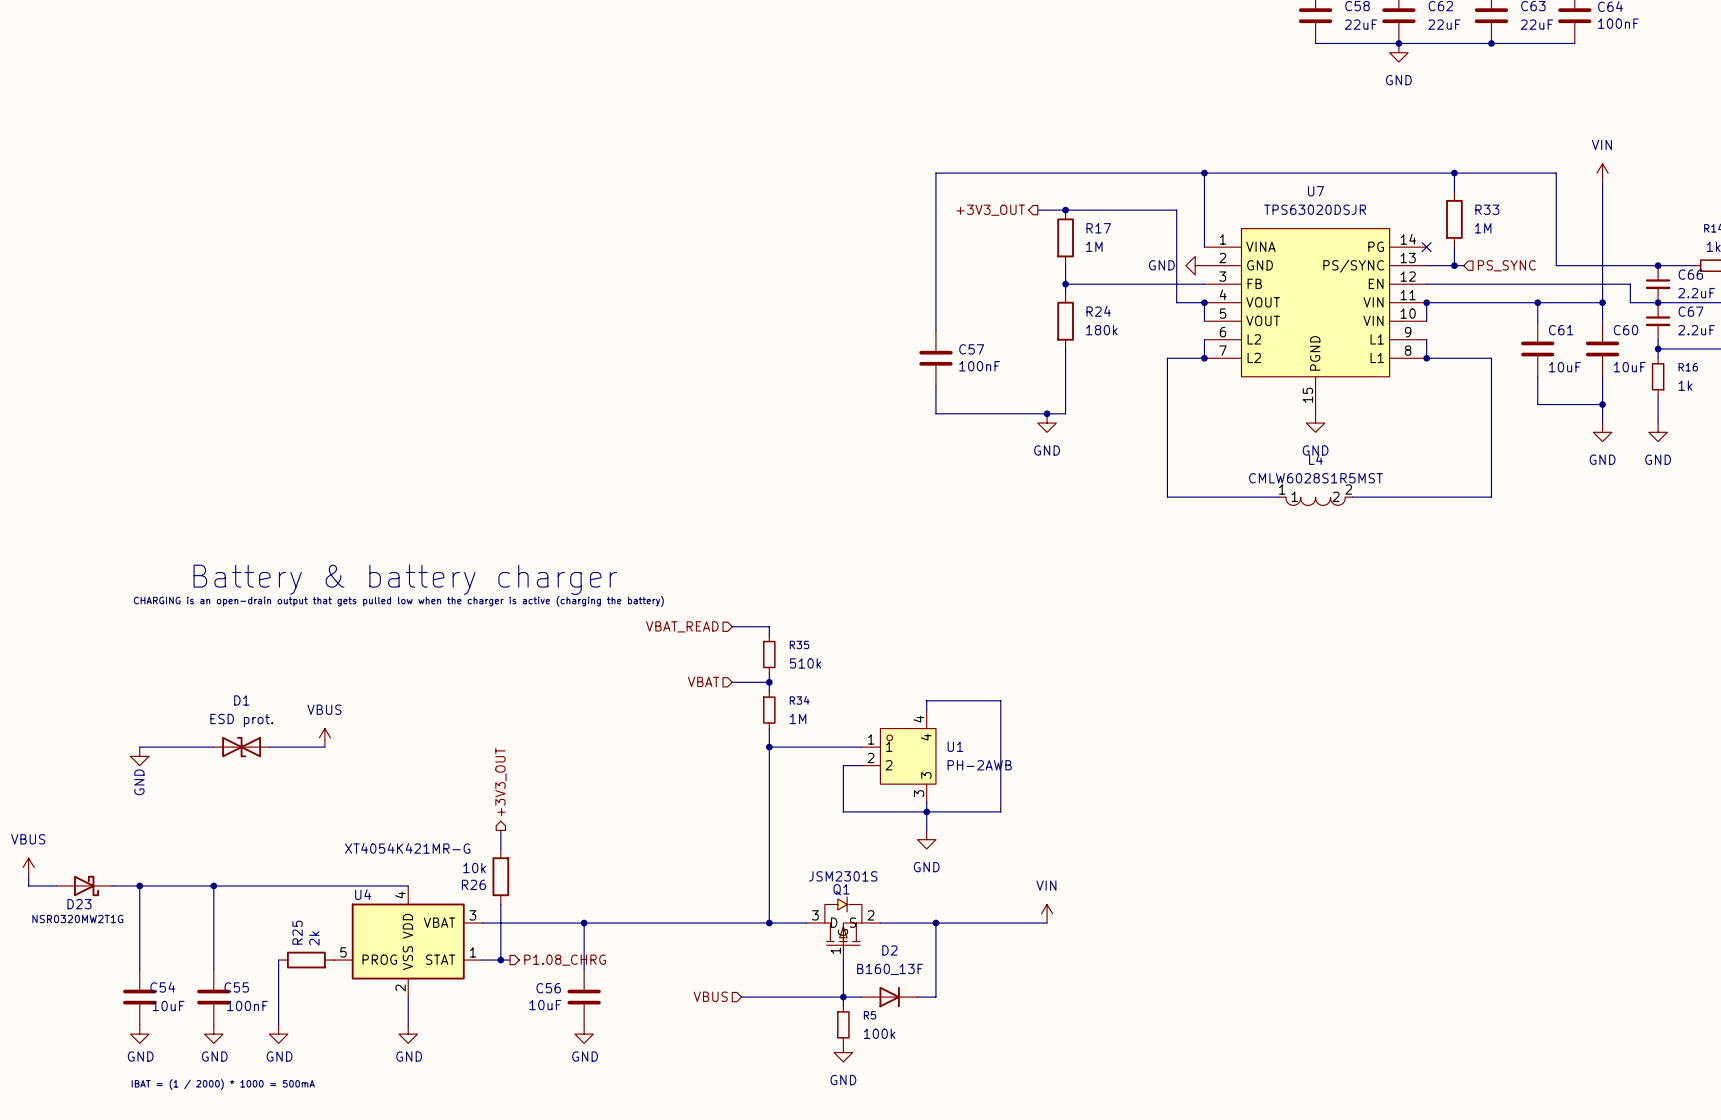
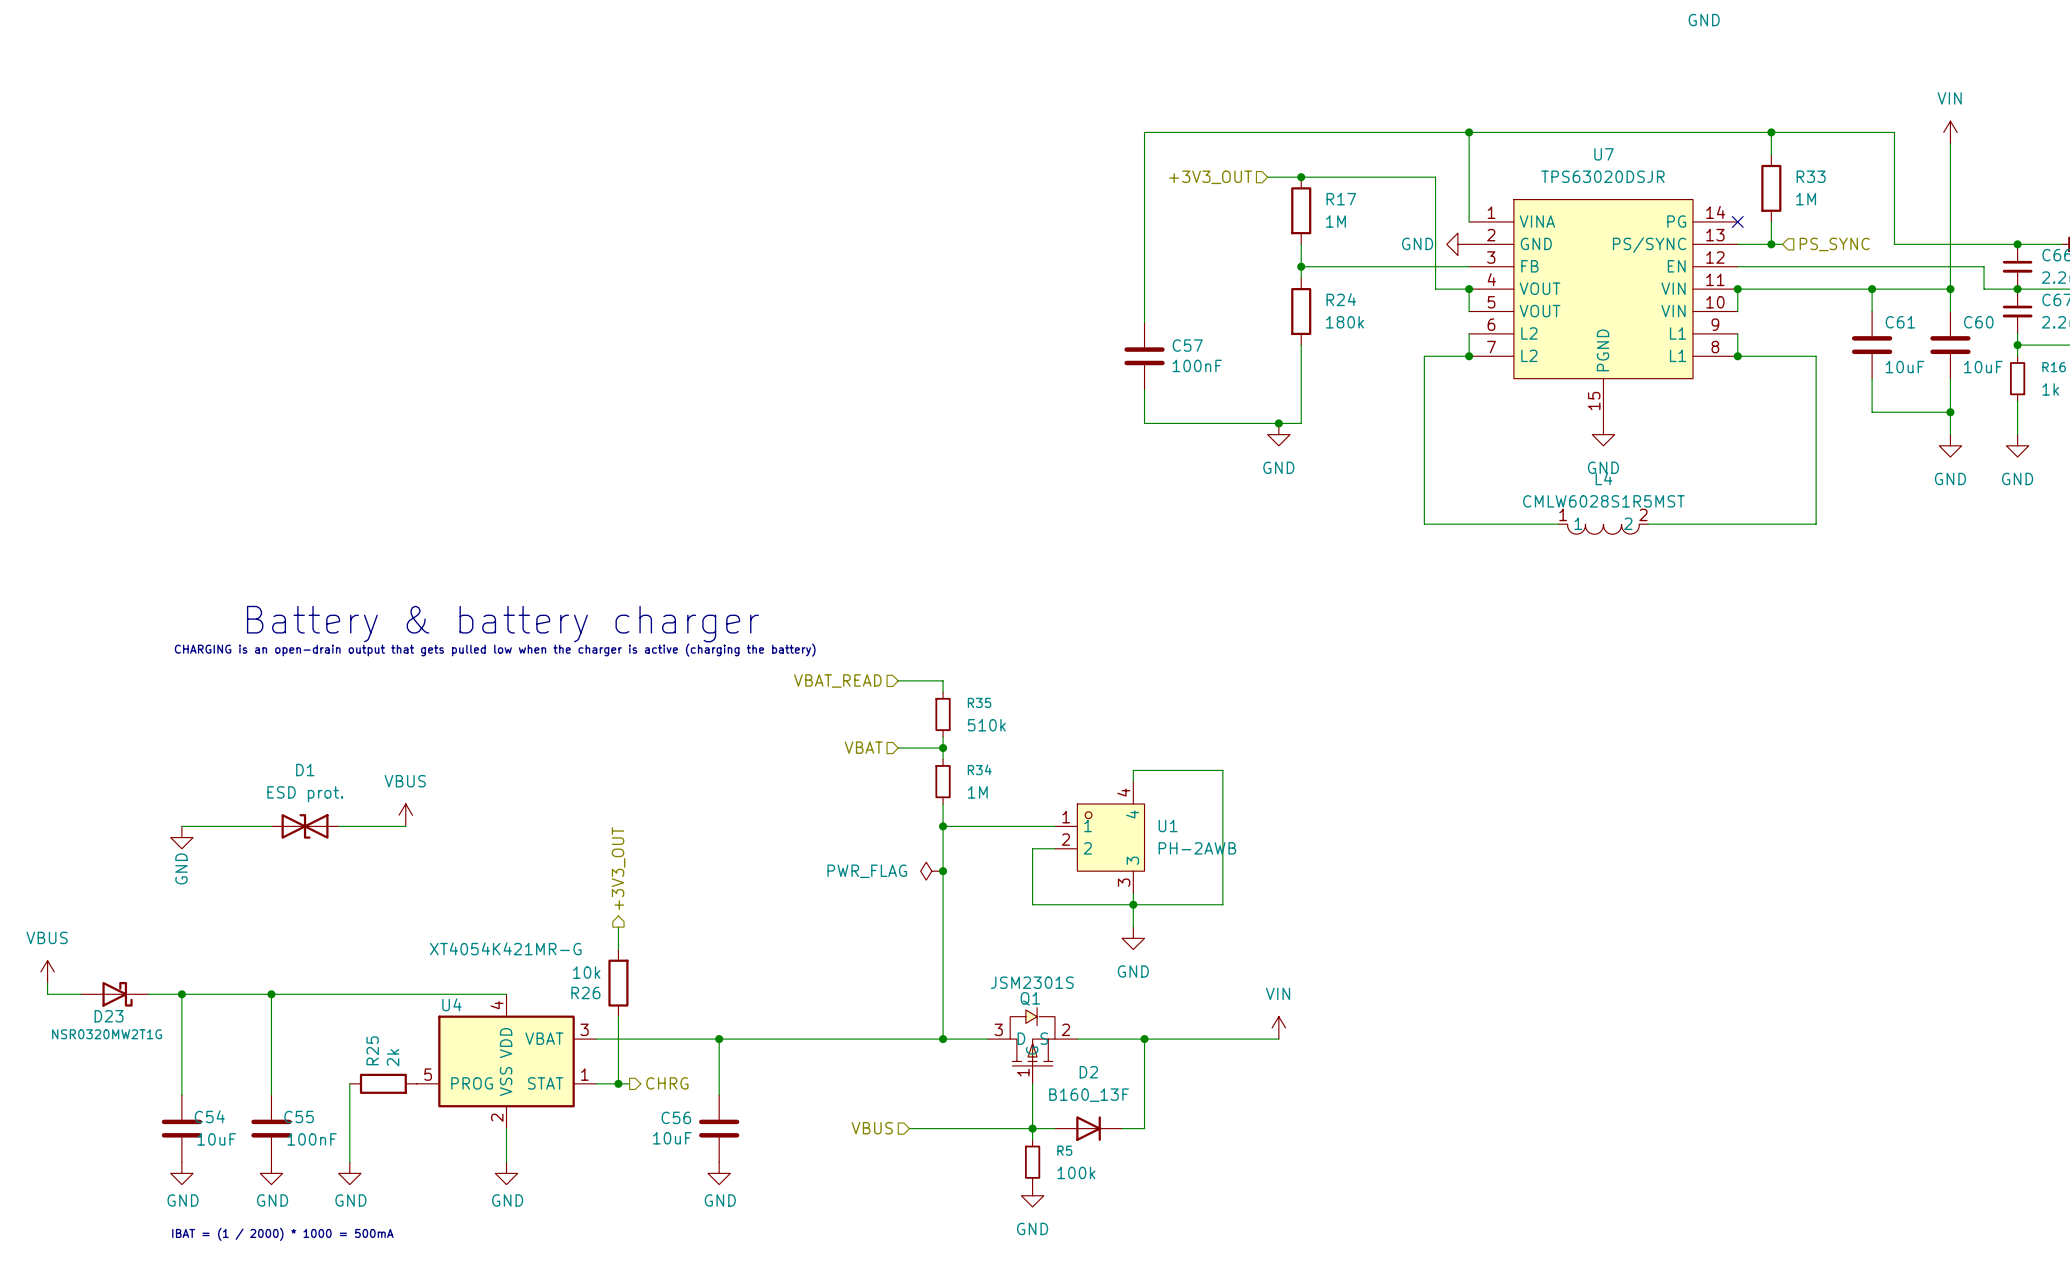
hierarchical label shape: output (990, 210) -> input (1210, 177)
power symbol: none -> PWR_FLAG (931, 871)
junction: none -> (943, 871)
hierarchical label: P1.08_CHRG (565, 960) -> CHRG (667, 1083)

